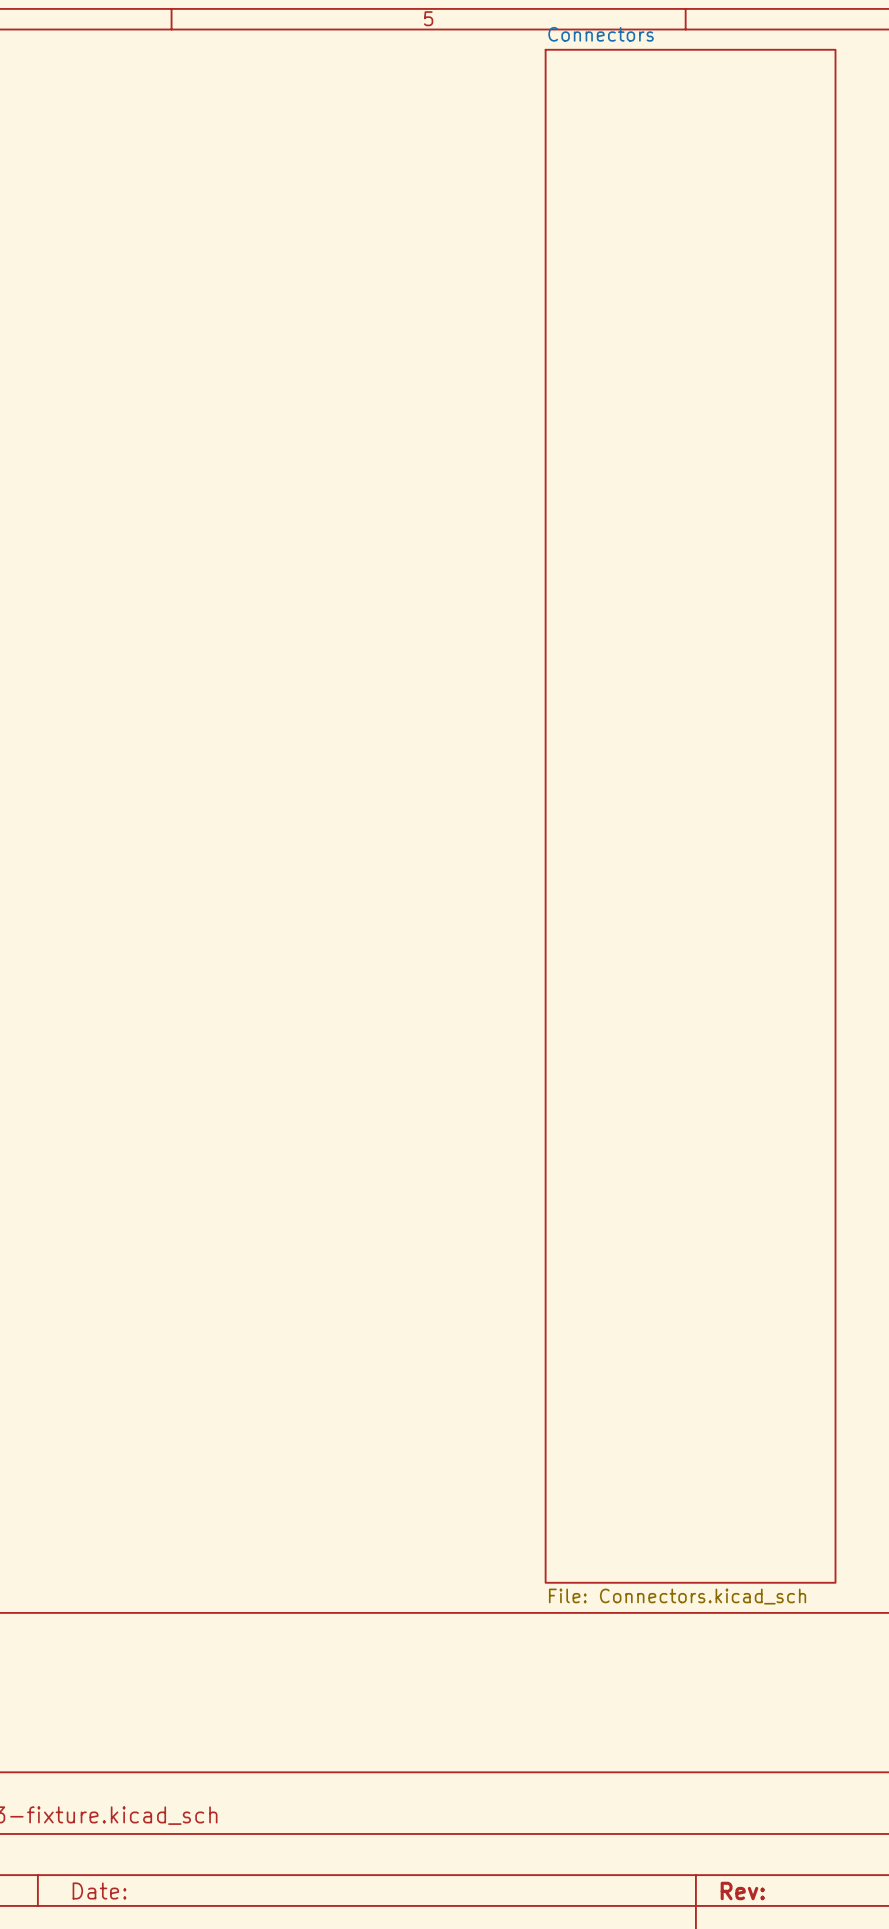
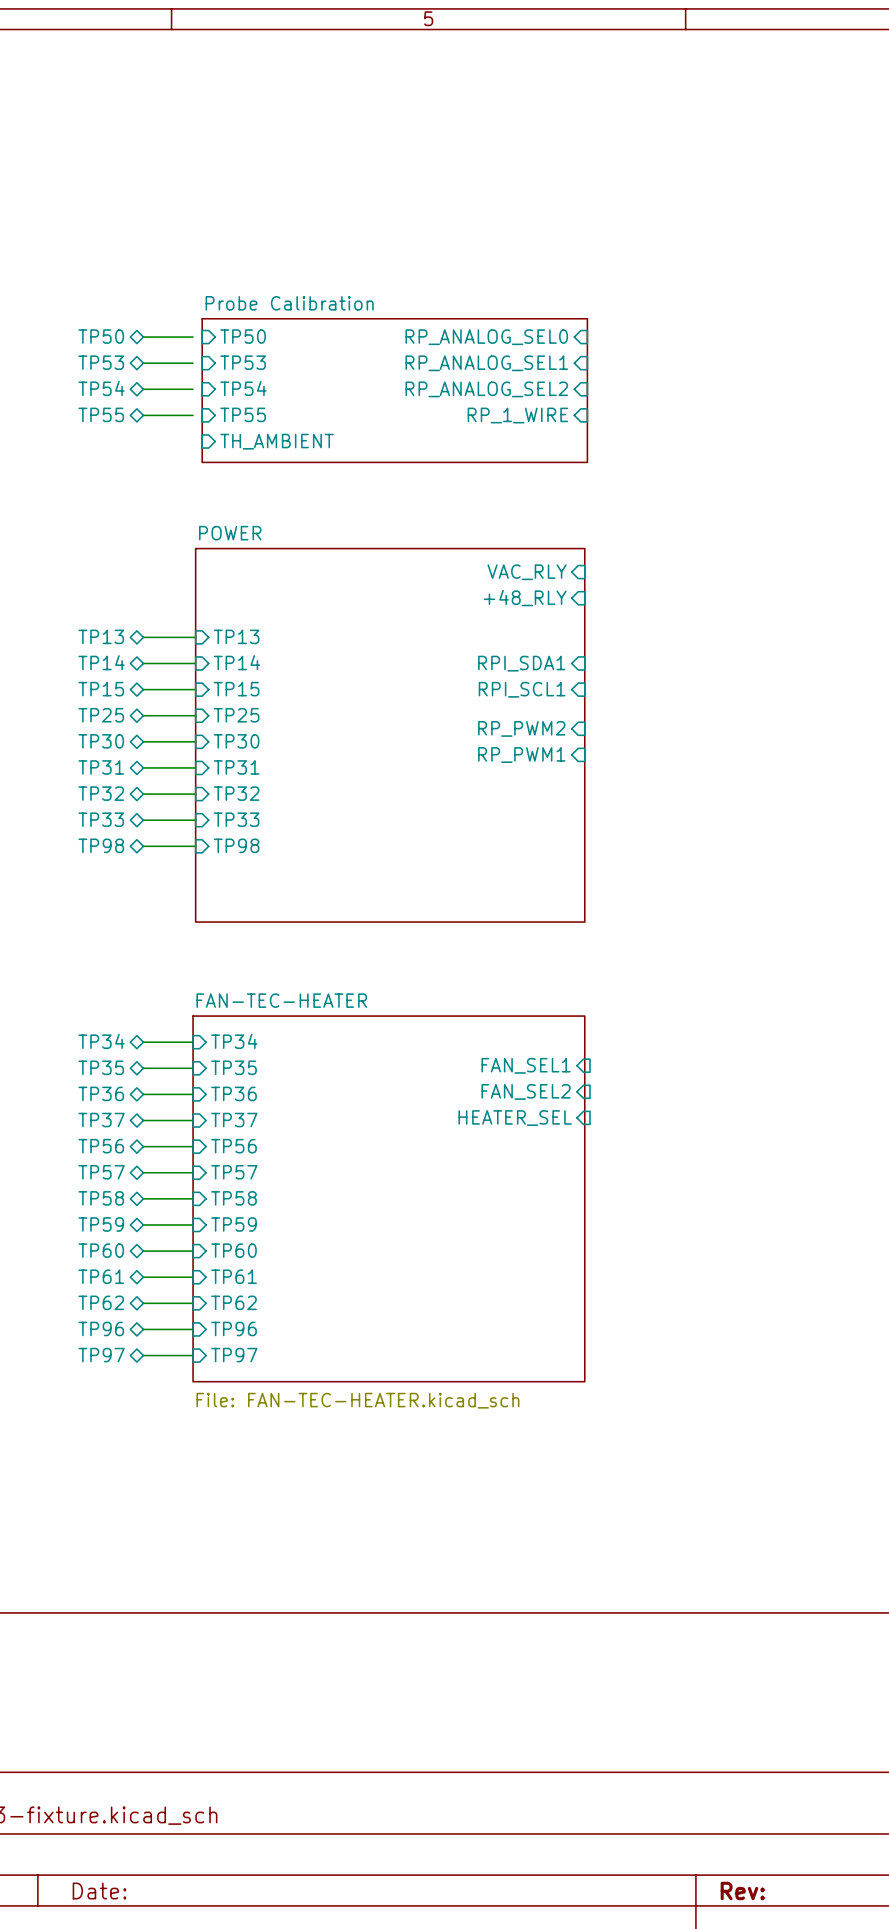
sheet pin: none -> TP50 (101, 336)
sheet pin: none -> TP50 (243, 336)
wire: none -> (143, 337) (193, 337)
sheet pin: none -> RP_ANALOG_SEL0 (486, 337)
sheet pin: none -> TP53 (101, 362)
sheet pin: none -> TP53 (243, 362)
wire: none -> (143, 363) (193, 363)
sheet pin: none -> RP_ANALOG_SEL1 (486, 363)
sheet pin: none -> TP54 (101, 388)
sheet pin: none -> TP54 (243, 388)
wire: none -> (143, 389) (193, 389)
sheet pin: none -> RP_ANALOG_SEL2 (486, 389)
sheet Probe Calibration: none -> (394, 390)
sheet pin: none -> TP55 (101, 414)
sheet pin: none -> TP55 (243, 414)
wire: none -> (143, 415) (193, 415)
sheet pin: none -> RP_1_WIRE (517, 415)
sheet pin: none -> TH_AMBIENT (277, 441)
sheet pin: none -> VAC_RLY (527, 572)
sheet pin: none -> +48_RLY (525, 598)
sheet pin: none -> TP13 (101, 636)
sheet pin: none -> TP13 (236, 636)
wire: none -> (143, 637) (195, 637)
sheet pin: none -> TP14 (101, 662)
sheet pin: none -> TP14 (236, 662)
wire: none -> (143, 663) (195, 663)
sheet pin: none -> RPI_SDA1 (521, 663)
sheet pin: none -> TP15 (101, 689)
wire: none -> (143, 689) (195, 689)
sheet pin: none -> TP15 (236, 689)
sheet pin: none -> RPI_SCL1 (522, 689)
sheet pin: none -> TP25 (101, 715)
wire: none -> (143, 715) (195, 715)
sheet pin: none -> TP25 (236, 715)
sheet pin: none -> RP_PWM2 (521, 728)
sheet POWER: none -> (390, 735)
sheet pin: none -> TP30 (101, 741)
wire: none -> (143, 741) (195, 741)
sheet pin: none -> TP30 (236, 741)
sheet pin: none -> RP_PWM1 (521, 755)
sheet pin: none -> TP31 (101, 767)
wire: none -> (143, 767) (195, 767)
sheet pin: none -> TP31 (236, 767)
sheet pin: none -> TP32 (101, 793)
sheet pin: none -> TP32 (236, 793)
wire: none -> (143, 794) (195, 794)
sheet Connectors: File: Connectors.kicad_sch (690, 816) -> none
sheet pin: none -> TP33 (101, 819)
sheet pin: none -> TP33 (236, 819)
wire: none -> (143, 820) (195, 820)
sheet pin: none -> TP98 (101, 845)
sheet pin: none -> TP98 (236, 845)
wire: none -> (143, 846) (195, 846)
sheet pin: none -> TP34 (101, 1041)
sheet pin: none -> TP34 (234, 1041)
wire: none -> (143, 1042) (193, 1042)
sheet pin: none -> FAN_SEL1 (526, 1065)
sheet pin: none -> TP35 (101, 1067)
sheet pin: none -> TP35 (233, 1067)
wire: none -> (143, 1068) (193, 1068)
sheet pin: none -> FAN_SEL2 (526, 1091)
sheet pin: none -> TP36 (101, 1093)
sheet pin: none -> TP36 (233, 1093)
wire: none -> (143, 1094) (193, 1094)
sheet pin: none -> HEATER_SEL (515, 1118)
sheet pin: none -> TP37 (101, 1120)
wire: none -> (143, 1120) (193, 1120)
sheet pin: none -> TP37 (234, 1120)
sheet pin: none -> TP56 (101, 1146)
wire: none -> (143, 1146) (193, 1146)
sheet pin: none -> TP56 (233, 1146)
sheet pin: none -> TP57 (101, 1172)
wire: none -> (143, 1172) (193, 1172)
sheet pin: none -> TP57 (234, 1172)
sheet pin: none -> TP58 (101, 1198)
wire: none -> (143, 1198) (193, 1198)
sheet pin: none -> TP58 (233, 1198)
sheet FAN-TEC-HEATER: none -> File: FAN-TEC-HEATER.kicad_sch (388, 1198)
sheet pin: none -> TP59 (101, 1224)
wire: none -> (143, 1224) (193, 1224)
sheet pin: none -> TP59 (233, 1224)
sheet pin: none -> TP60 (101, 1250)
sheet pin: none -> TP60 (233, 1250)
wire: none -> (143, 1251) (193, 1251)
sheet pin: none -> TP61 (101, 1276)
sheet pin: none -> TP61 (233, 1276)
wire: none -> (143, 1277) (193, 1277)
sheet pin: none -> TP62 (101, 1302)
sheet pin: none -> TP62 (233, 1302)
wire: none -> (143, 1303) (193, 1303)
sheet pin: none -> TP96 (101, 1328)
sheet pin: none -> TP96 (233, 1328)
wire: none -> (143, 1329) (193, 1329)
sheet pin: none -> TP97 (101, 1355)
wire: none -> (143, 1355) (193, 1355)
sheet pin: none -> TP97 (234, 1355)

